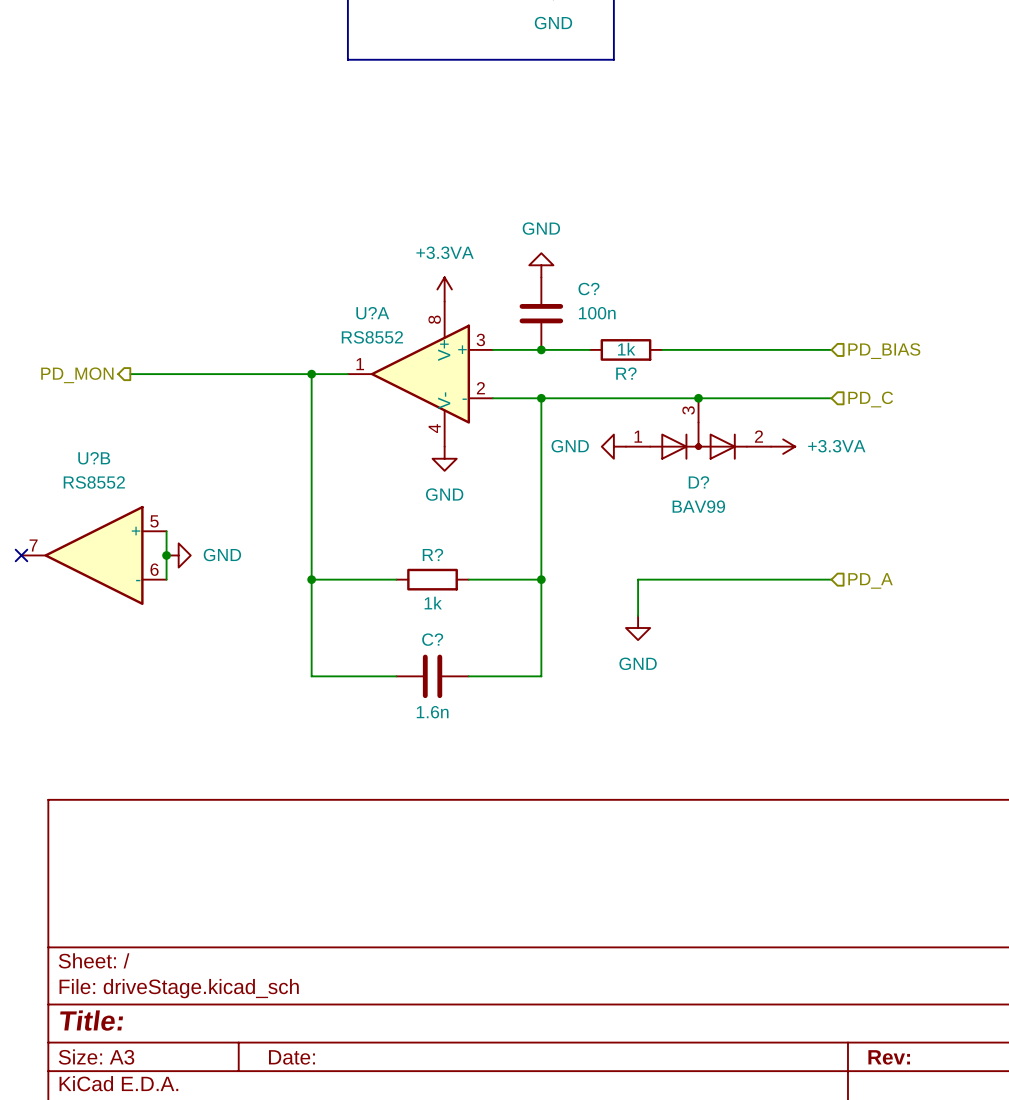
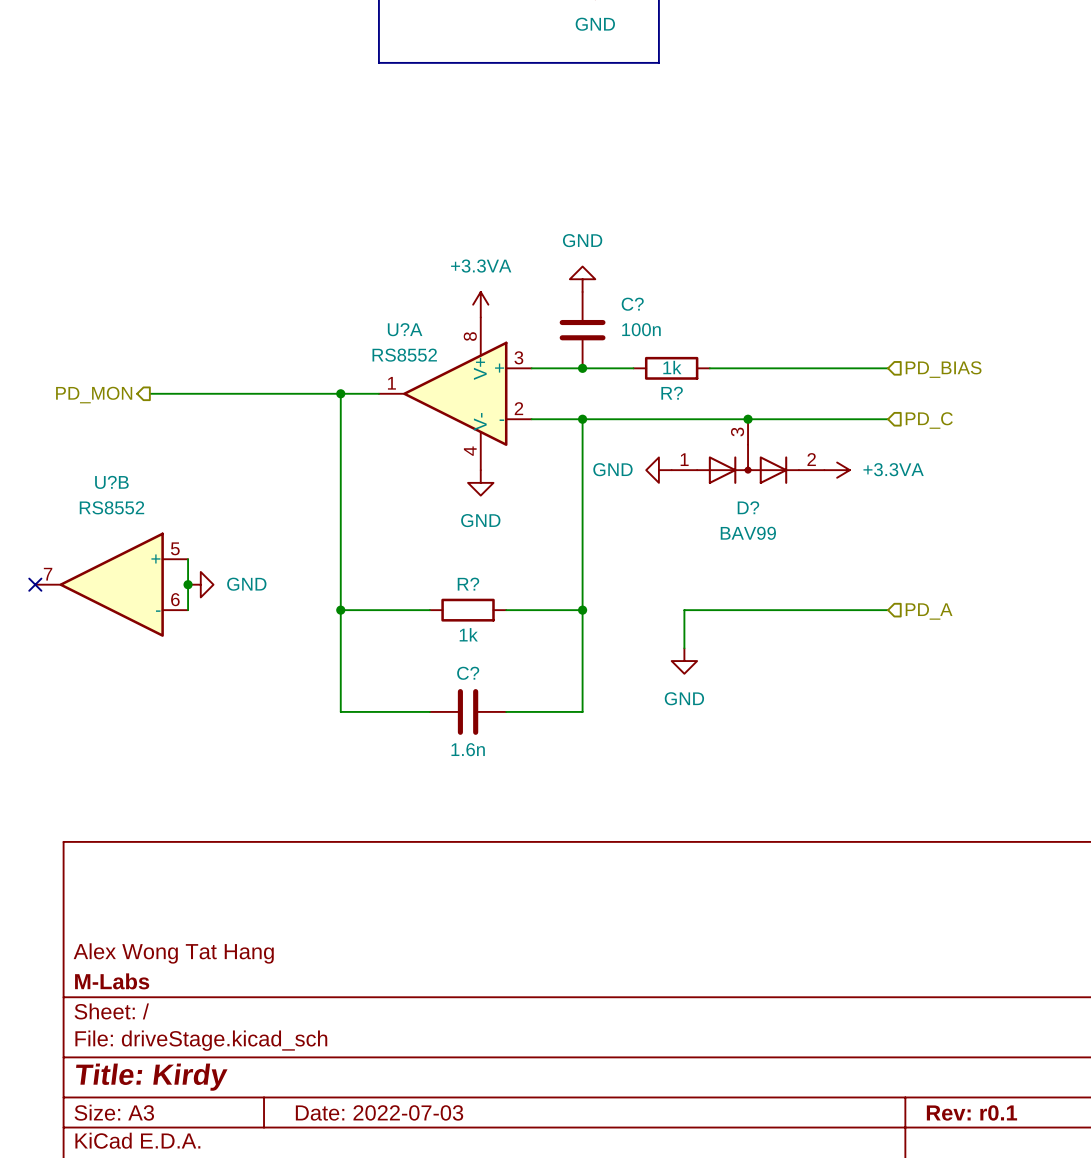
title block: none -> Alex Wong Tat Hang (173, 953)
title block: none -> M-Labs (112, 981)
title block: Title: (91, 1020) -> Title: Kirdy (151, 1077)
title block: Date: (291, 1057) -> Date: 2022-07-03 (379, 1112)
title block: Rev: (889, 1057) -> Rev: r0.1 (971, 1112)

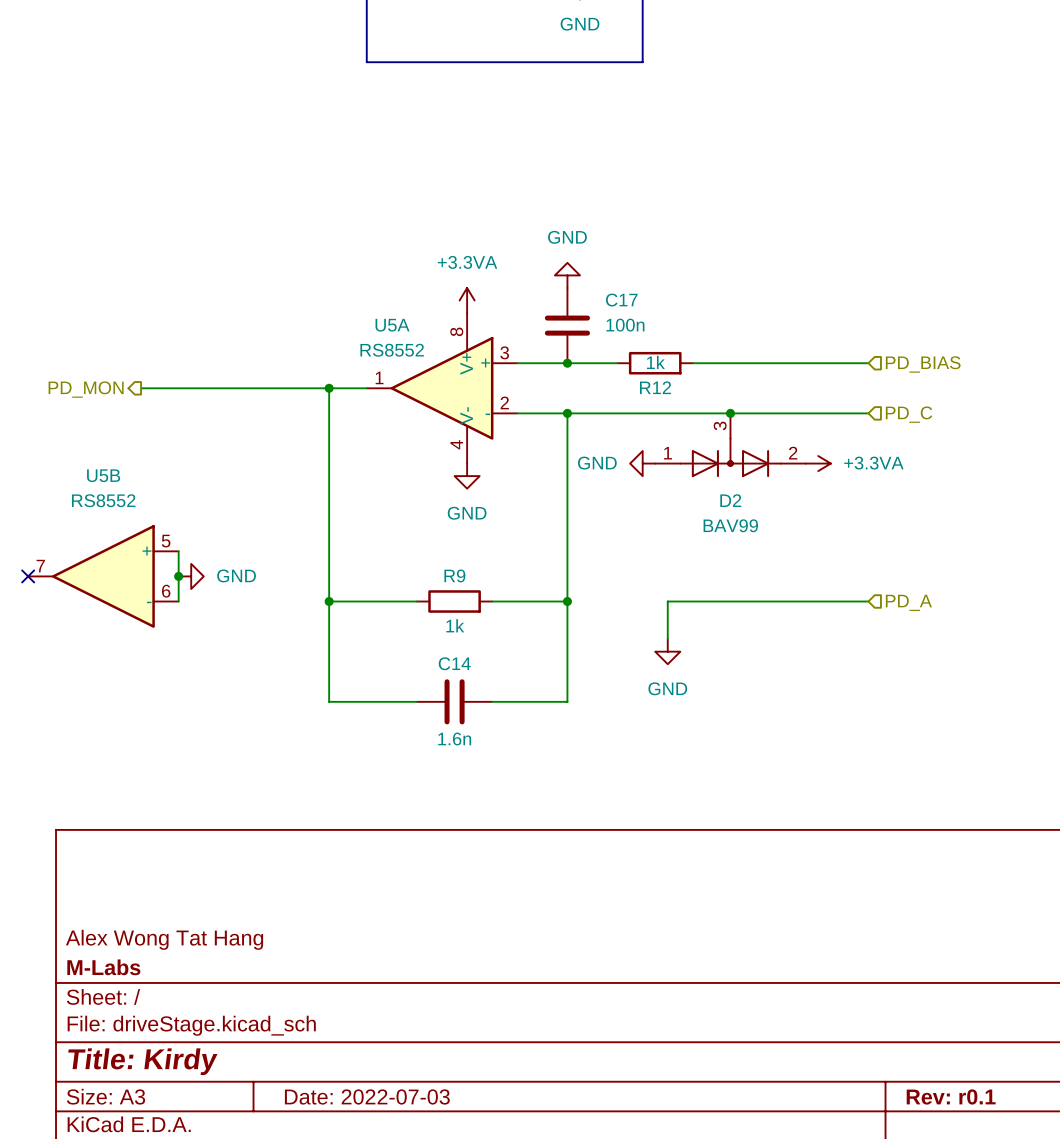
C? name: C? (632, 304) -> C17 (621, 300)
U?A name: U?A (405, 329) -> U5A (392, 325)
R? name: R? (672, 393) -> R12 (655, 387)
U?B name: U?B (111, 482) -> U5B (103, 475)
D? name: D? (748, 507) -> D2 (730, 500)
R? name: R? (468, 584) -> R9 (454, 575)
C? name: C? (468, 673) -> C14 (454, 663)

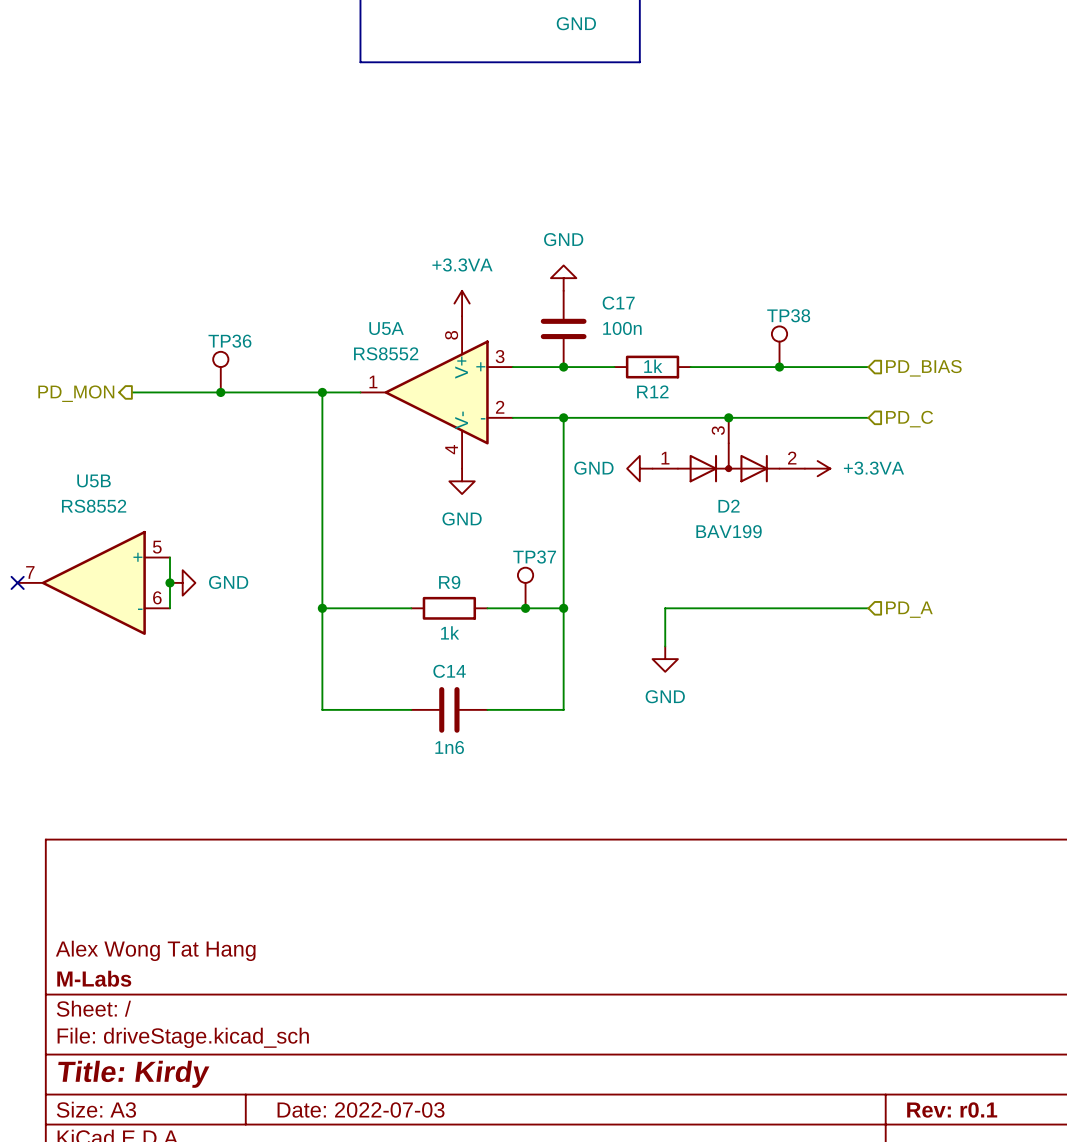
TP38: none -> (779, 346)
junction: none -> (779, 367)
TP36: none -> (220, 372)
junction: none -> (220, 392)
D2 value: BAV99 (730, 525) -> BAV199 (729, 531)
TP37: none -> (525, 588)
junction: none -> (525, 608)
C14 value: 1.6n (454, 738) -> 1n6 (449, 747)

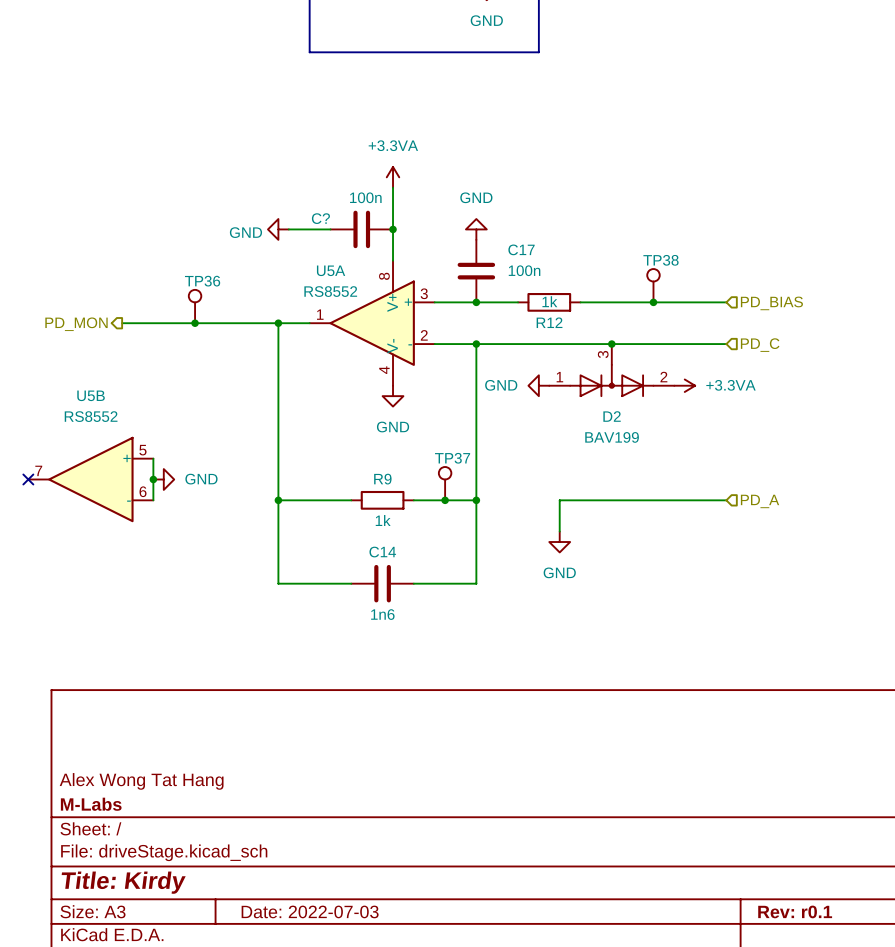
wire: none -> (393, 187) (393, 260)
power symbol: none -> GND (278, 229)
wire: none -> (288, 229) (330, 229)
C?: none -> 100n (361, 229)
junction: none -> (393, 229)
power symbol position: +3.3VA (462, 303) -> +3.3VA (393, 177)

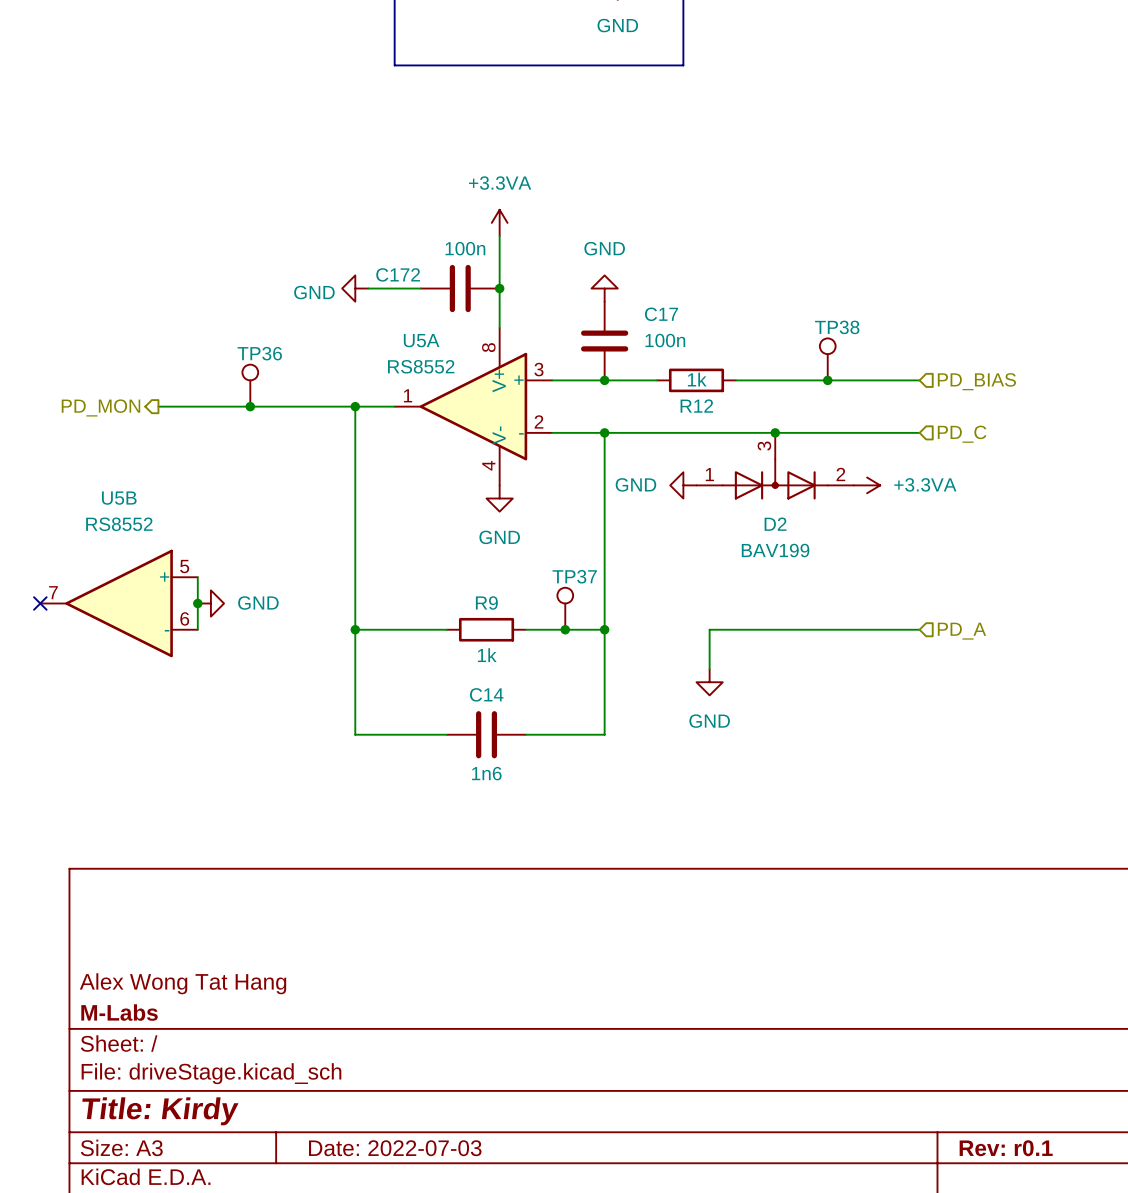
C? name: C? (320, 218) -> C172 (398, 274)

